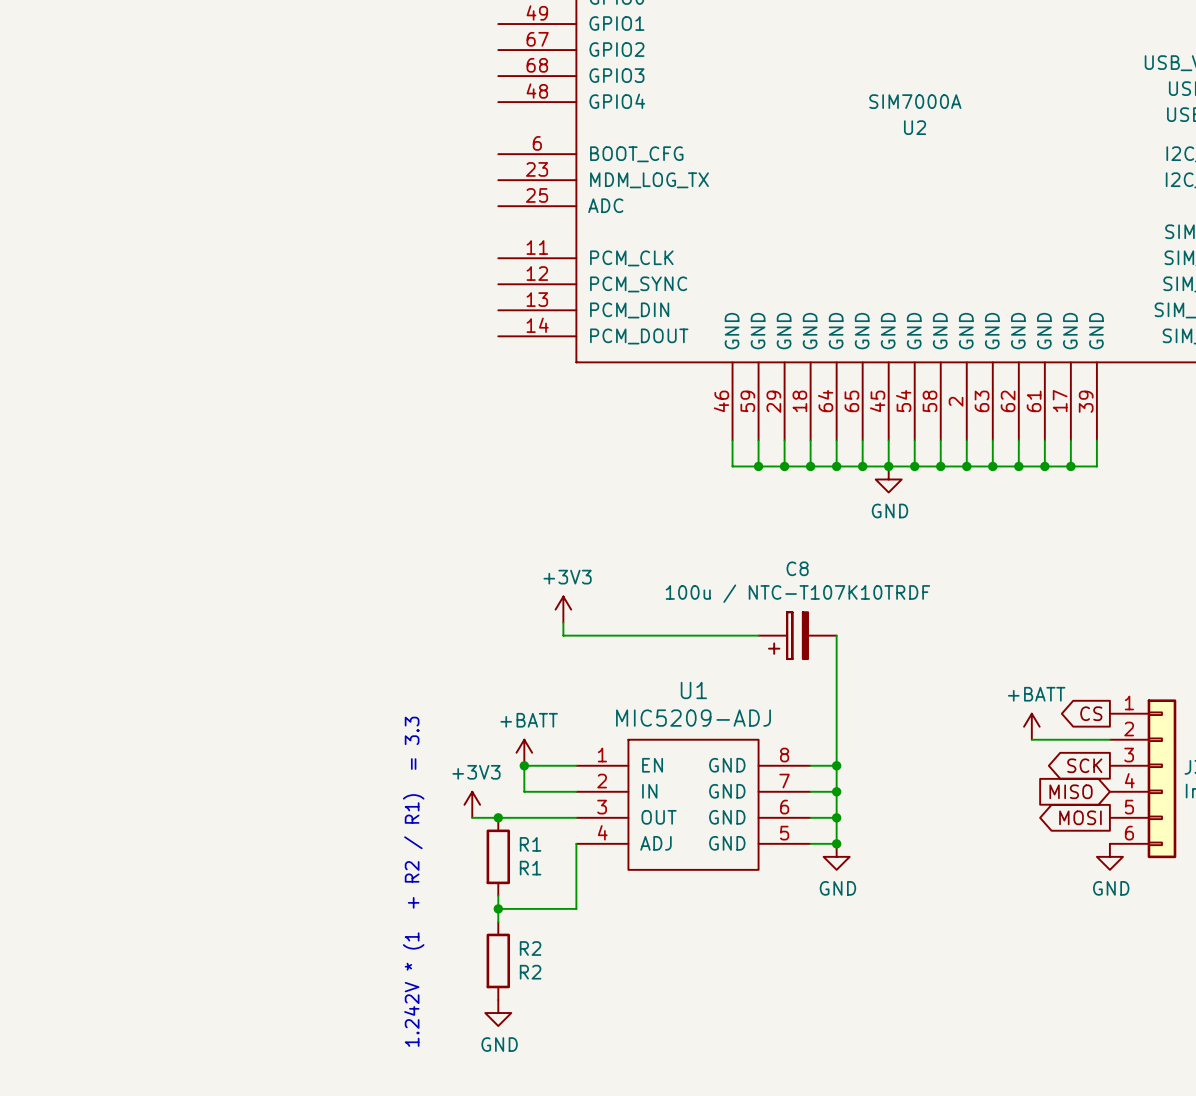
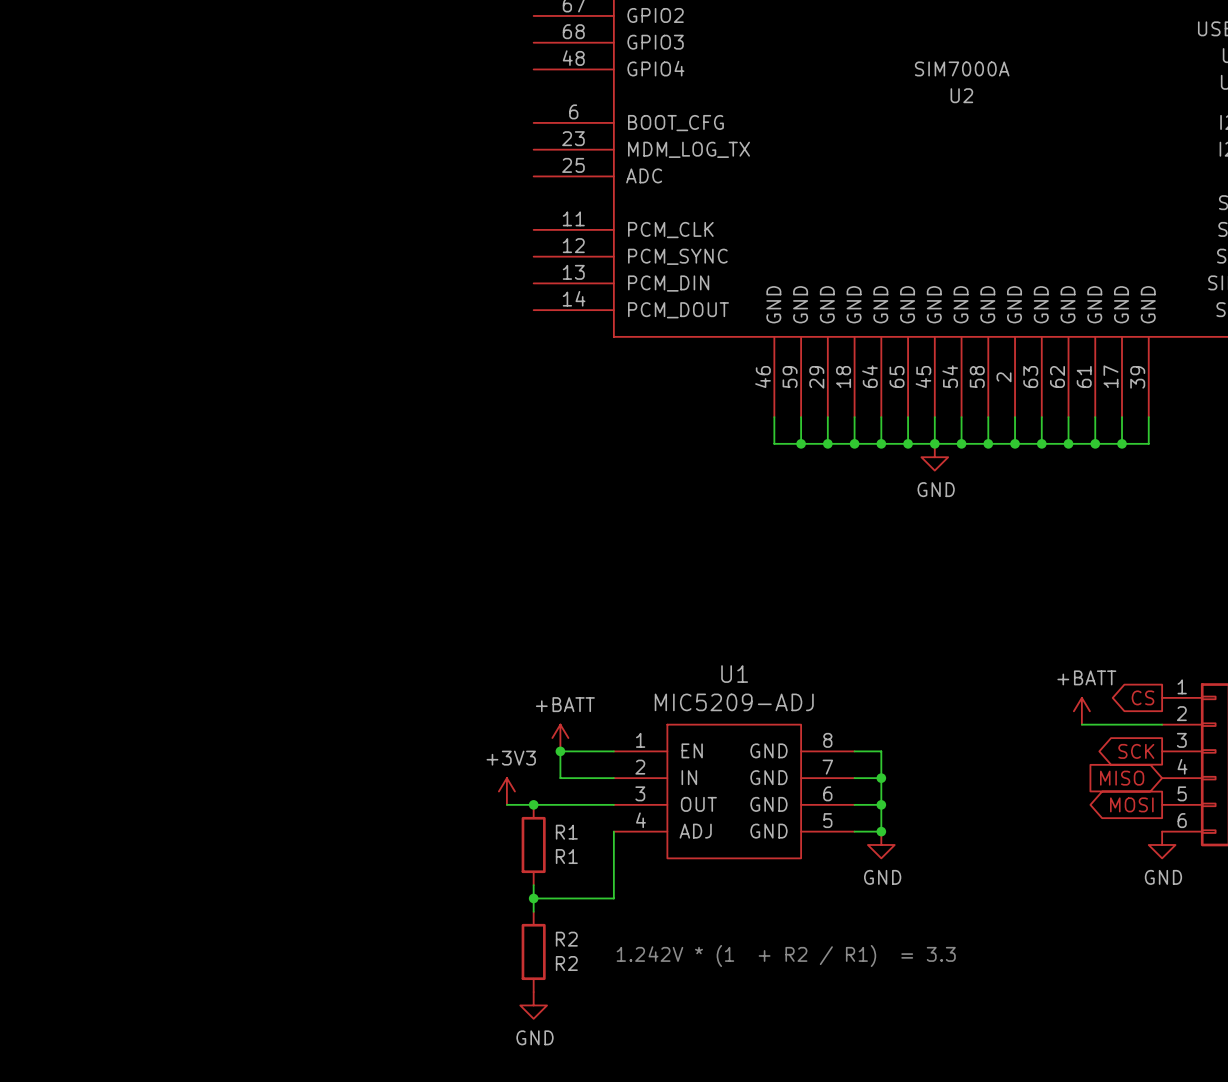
power symbol: +3V3 (563, 609) -> none
wire: (563, 622) (563, 635) (758, 635) -> none
C8: 100u / NTC-T107K10TRDF (797, 635) -> none
wire: (836, 635) (836, 765) -> none
junction: (836, 765) -> none
text rotation: 0° (413, 881) -> 90° clockwise (786, 955)

